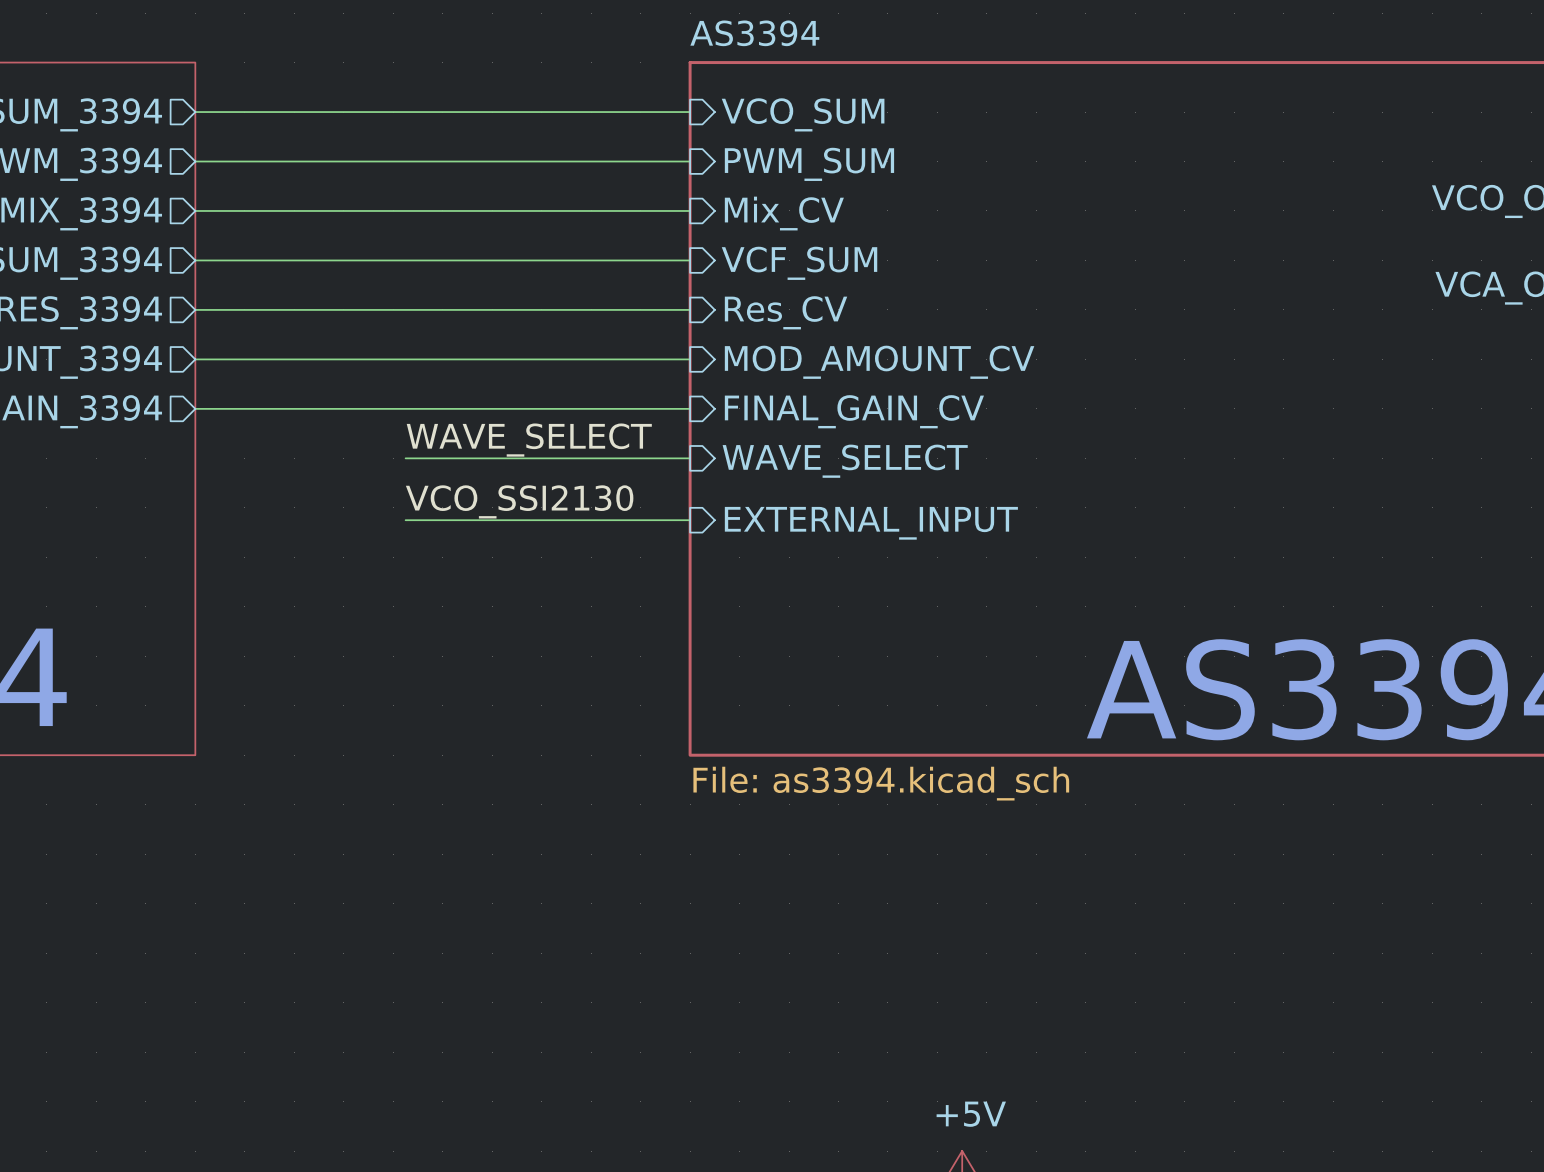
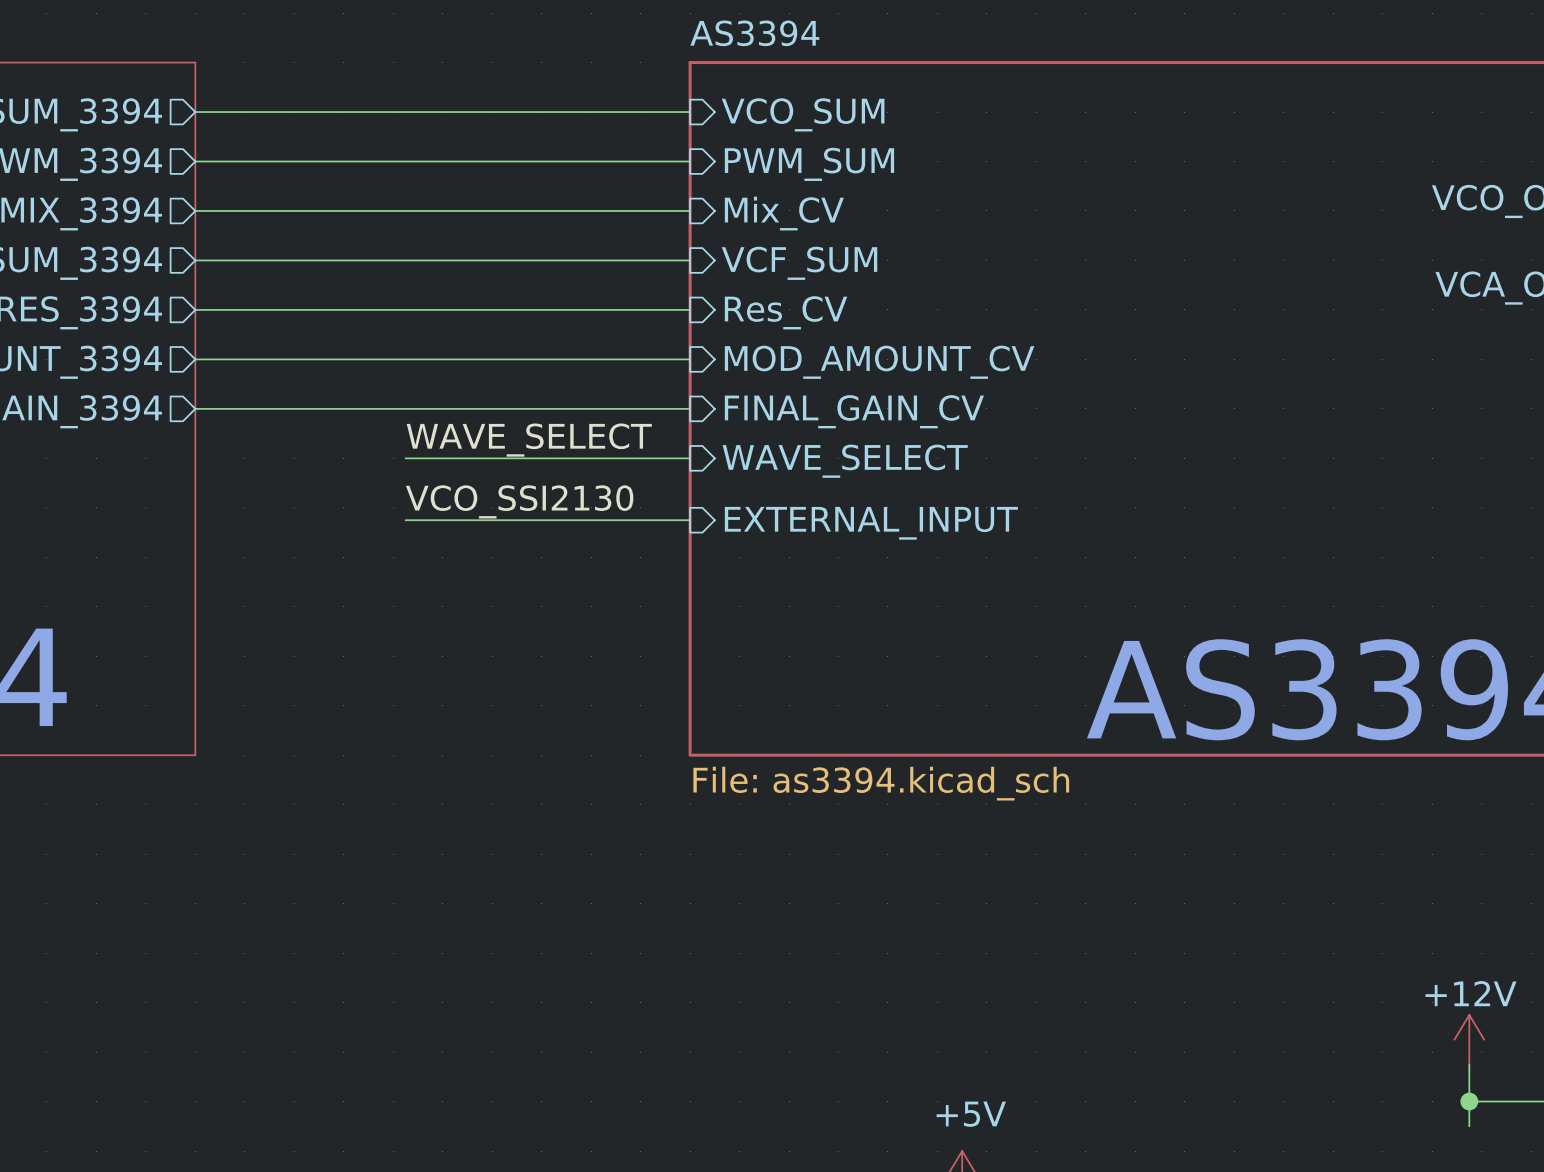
power symbol: none -> +12V (1469, 1039)
wire: none -> (1469, 1064) (1469, 1126)
wire: none -> (1469, 1101) (1543, 1101)
junction: none -> (1469, 1101)

